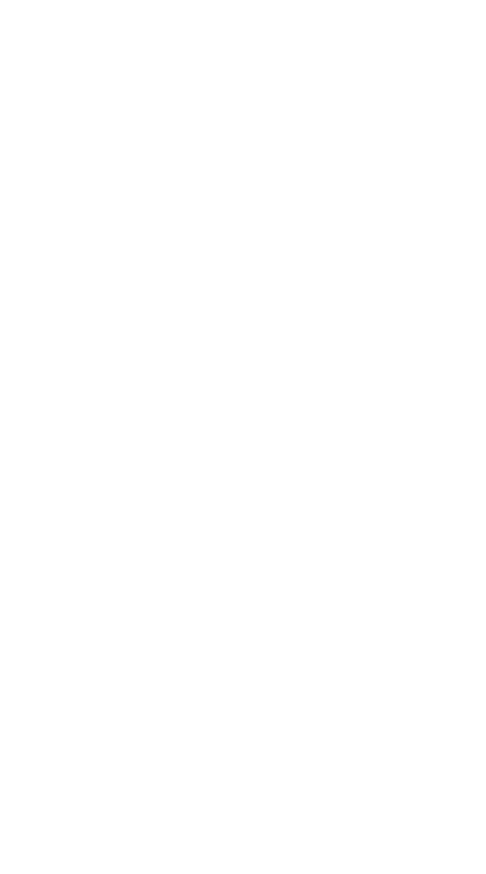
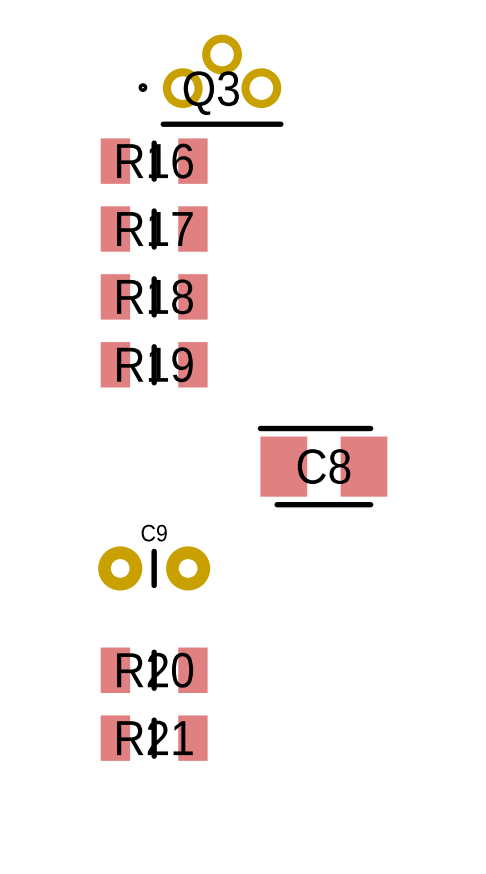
Q3: none -> (211, 80)
R16: none -> (154, 161)
R17: none -> (154, 229)
R18: none -> (154, 296)
R19: none -> (154, 364)
C8: none -> (322, 466)
C9: none -> (154, 568)
R20: none -> (154, 670)
R21: none -> (154, 738)

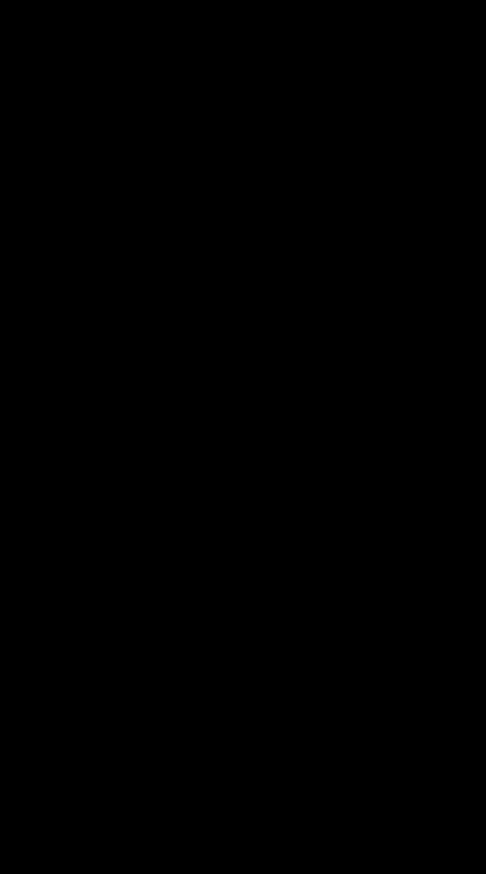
Q3: (211, 80) -> none
R16: (154, 161) -> none
R17: (154, 229) -> none
R18: (154, 296) -> none
R19: (154, 364) -> none
C8: (322, 466) -> none
C9: (154, 568) -> none
R20: (154, 670) -> none
R21: (154, 738) -> none

